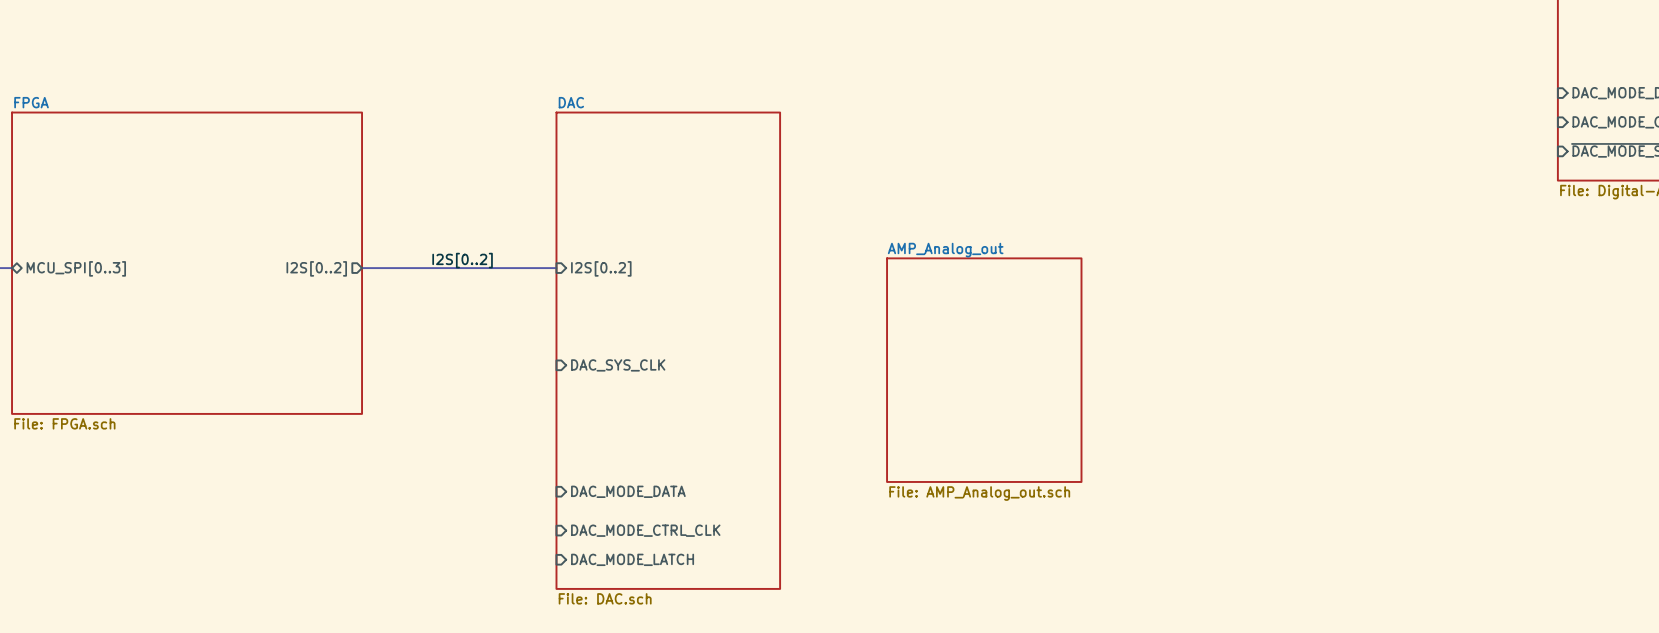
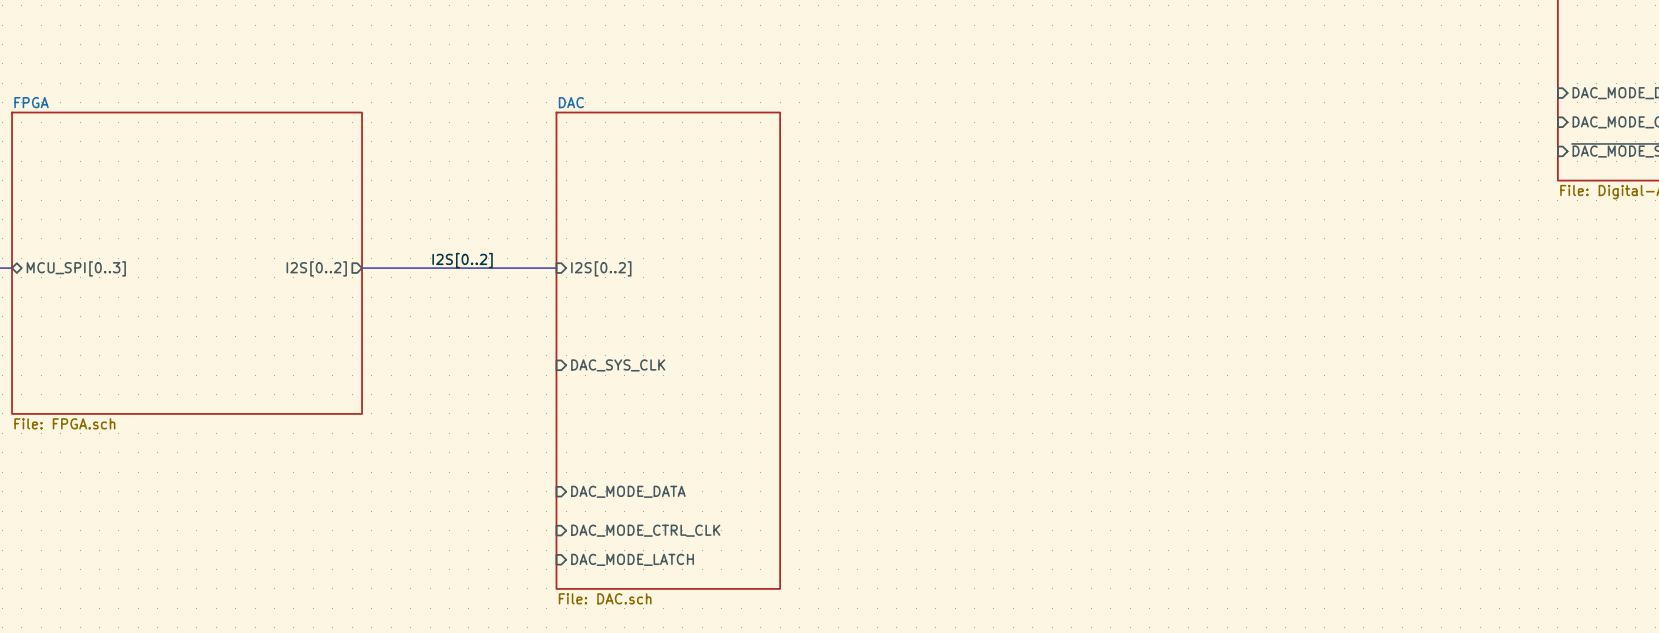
sheet AMP_Analog_out: File: AMP_Analog_out.sch (984, 370) -> none

